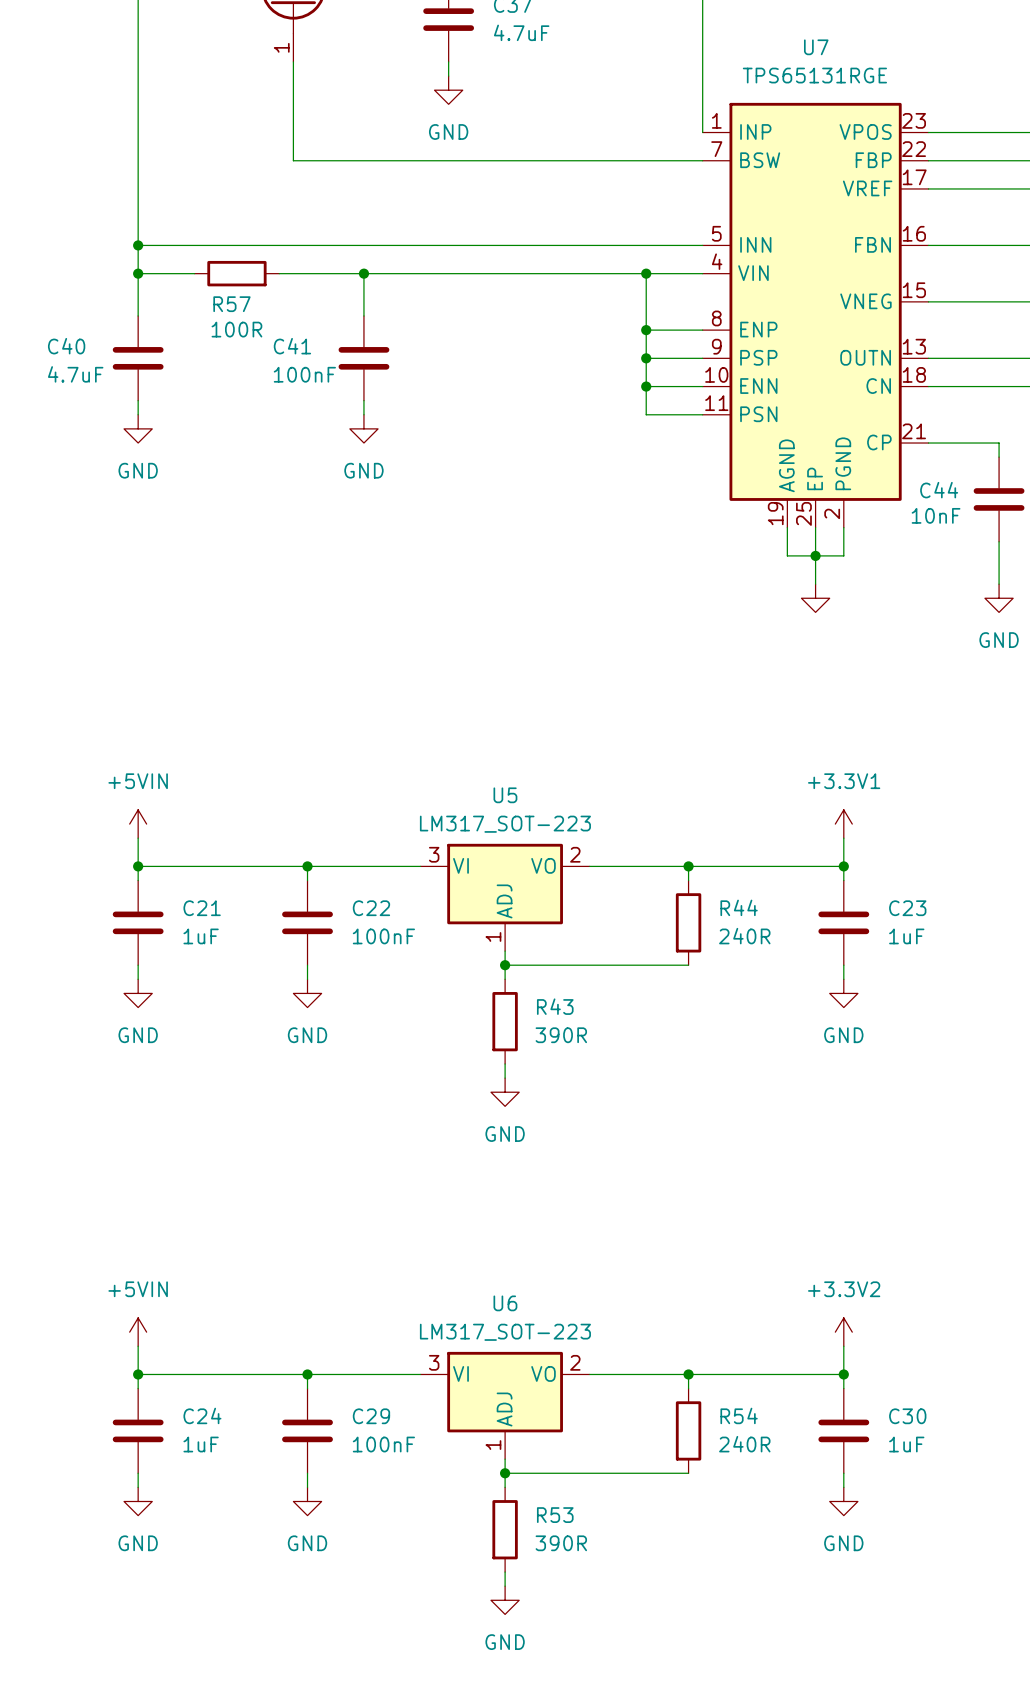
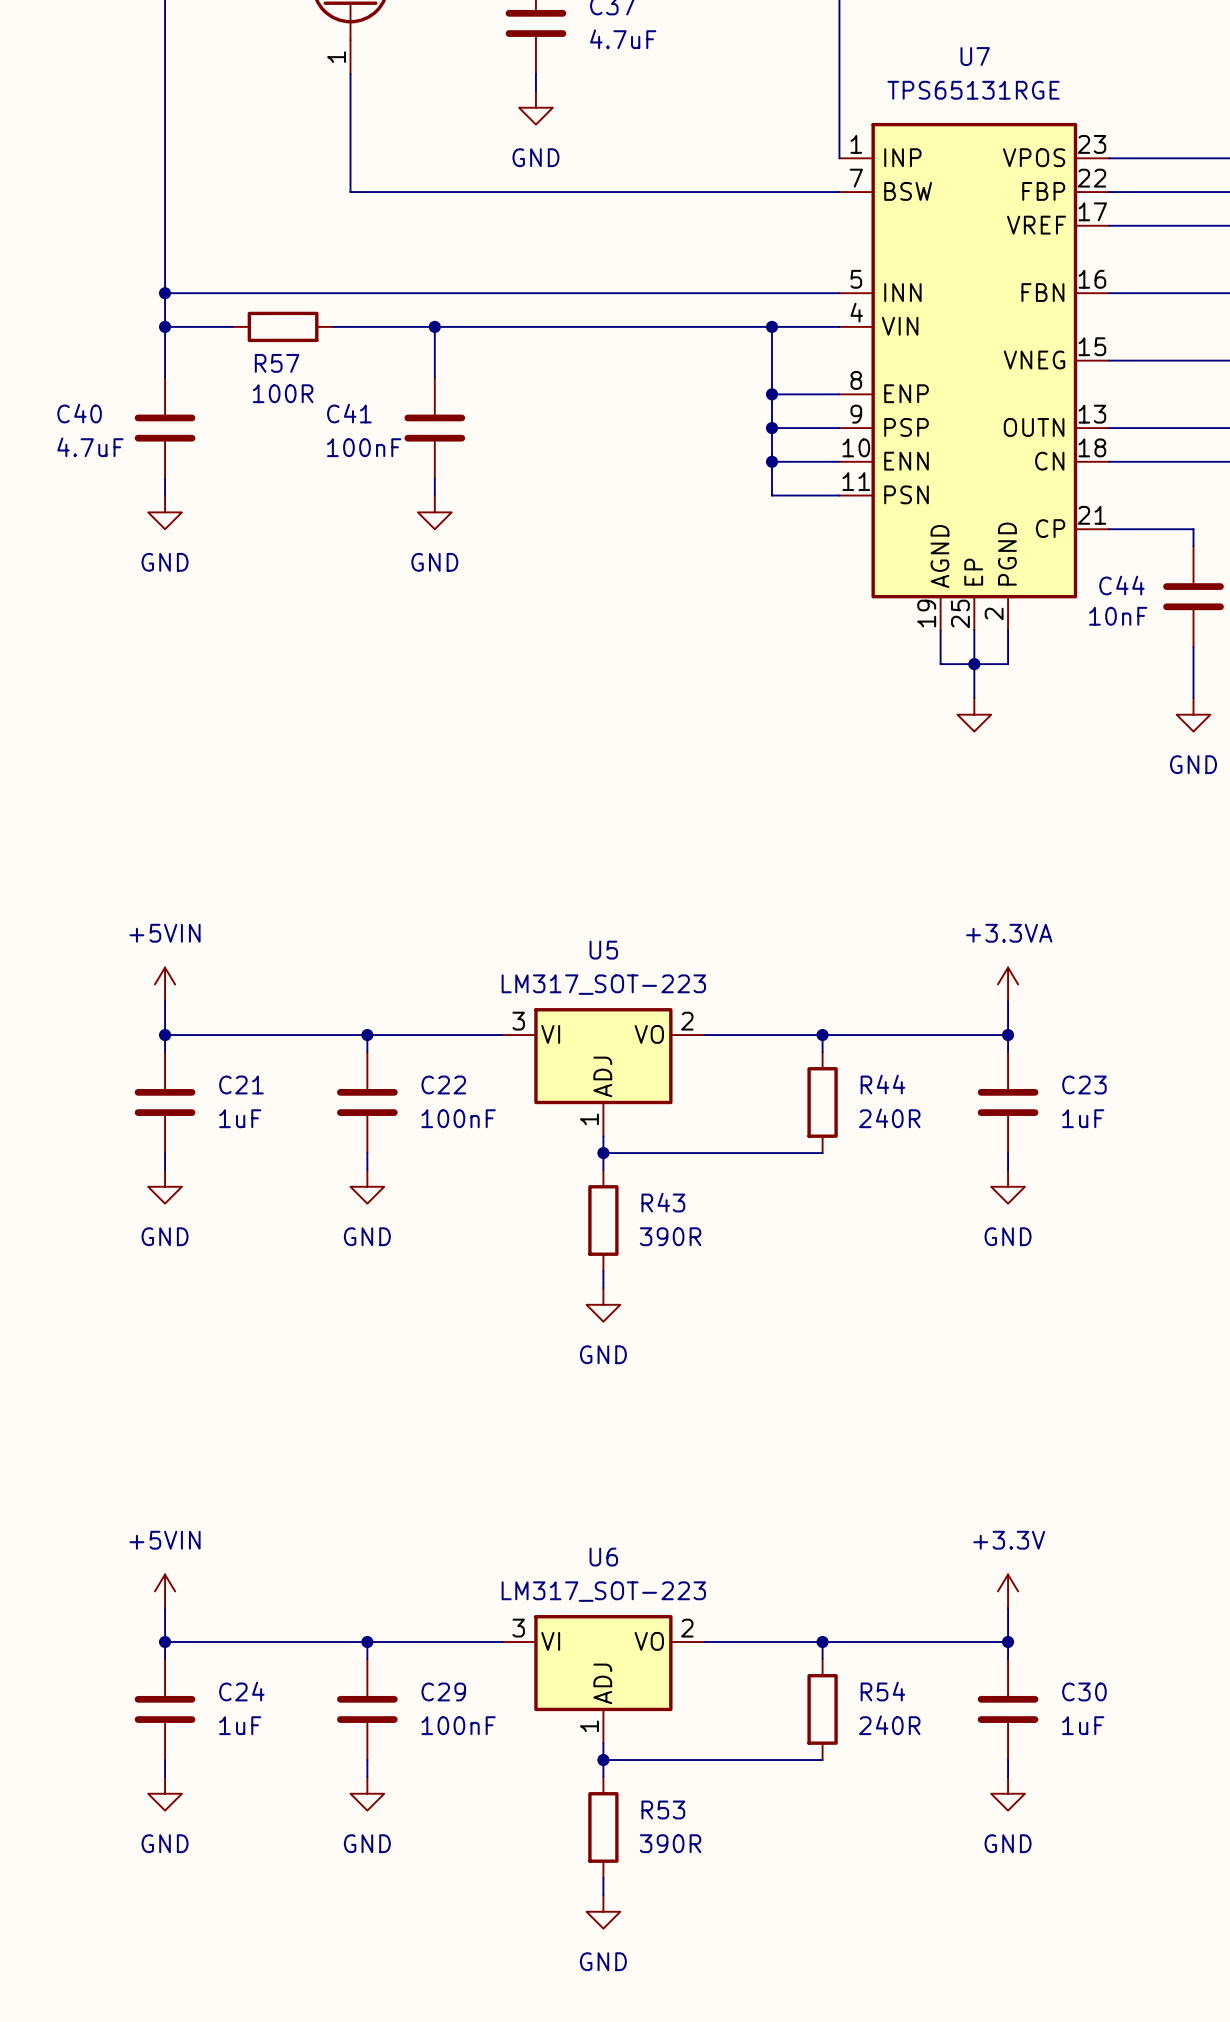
power symbol: +3.3V1 (843, 824) -> +3.3VA (1008, 984)
power symbol: +3.3V2 (843, 1332) -> +3.3V (1008, 1591)

